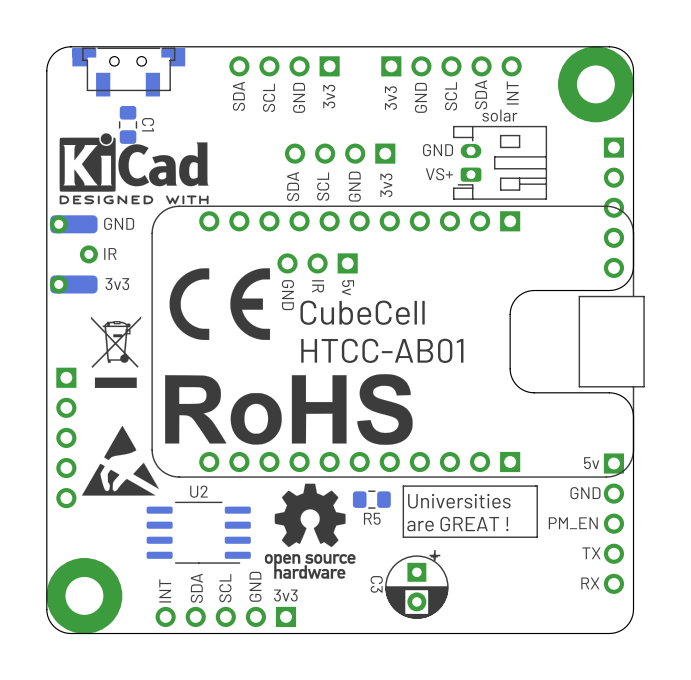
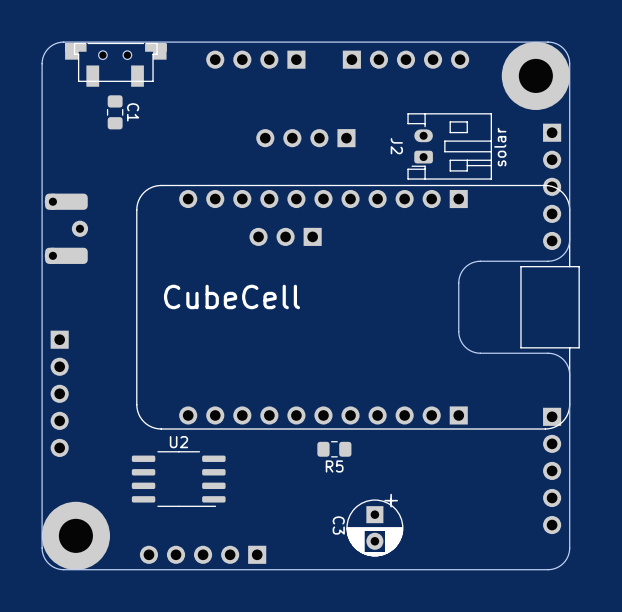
text: INT (512, 93) -> none
text: SDA (481, 94) -> none
text: SDA (238, 96) -> none
text: 3v3 (329, 96) -> none
text: SCL (451, 96) -> none
text: SCL (269, 97) -> none
text: GND (299, 97) -> none
text: GND (420, 97) -> none
text: 3v3 (390, 98) -> none
text rotation: 0° (499, 115) -> 90° counterclockwise (500, 147)
text position: solar (499, 115) -> solar (500, 147)
drawing: [59, 133, 209, 205] -> none
text: GND (438, 150) -> none
J2 name: none -> J2 (396, 146)
text: VS+ (439, 174) -> none
text: 3v3 (386, 185) -> none
text: SDA (293, 186) -> none
text: SCL (323, 186) -> none
text: GND (354, 186) -> none
text: GND (119, 223) -> none
text: IR (110, 253) -> none
drawing: [169, 268, 271, 340] -> none
text: 3v3 (117, 284) -> none
text: IR (318, 286) -> none
text: 5v (348, 287) -> none
text: GND (287, 295) -> none
text position: CubeCell (362, 312) -> CubeCell (231, 296)
drawing: [90, 316, 142, 388] -> none
text: HTCC-AB01 (382, 350) -> none
drawing: [81, 374, 413, 496] -> none
text: 5v (591, 463) -> none
drawing: [264, 483, 356, 579] -> none
line: (537, 486) (403, 486) (403, 537) (537, 537) (537, 486) -> none
text: GND (585, 493) -> none
text: Universities (459, 501) -> none
text: PM_EN (573, 523) -> none
text: are GREAT ! (457, 524) -> none
text: TX (591, 553) -> none
text: RX (590, 583) -> none
text: GND (255, 586) -> none
text: SDA (196, 588) -> none
text: SCL (225, 588) -> none
text: INT (165, 590) -> none
text: 3v3 (285, 595) -> none

